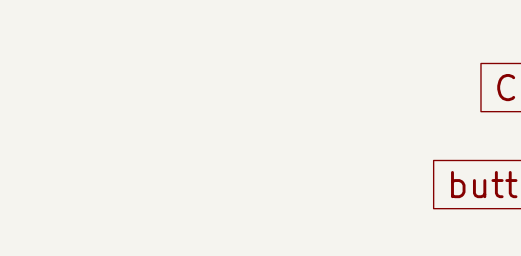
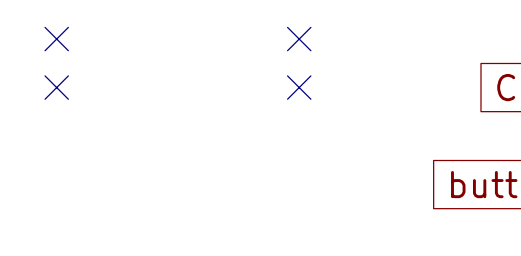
no-connect mark: none -> (56, 39)
no-connect mark: none -> (299, 39)
no-connect mark: none -> (56, 87)
no-connect mark: none -> (299, 87)

